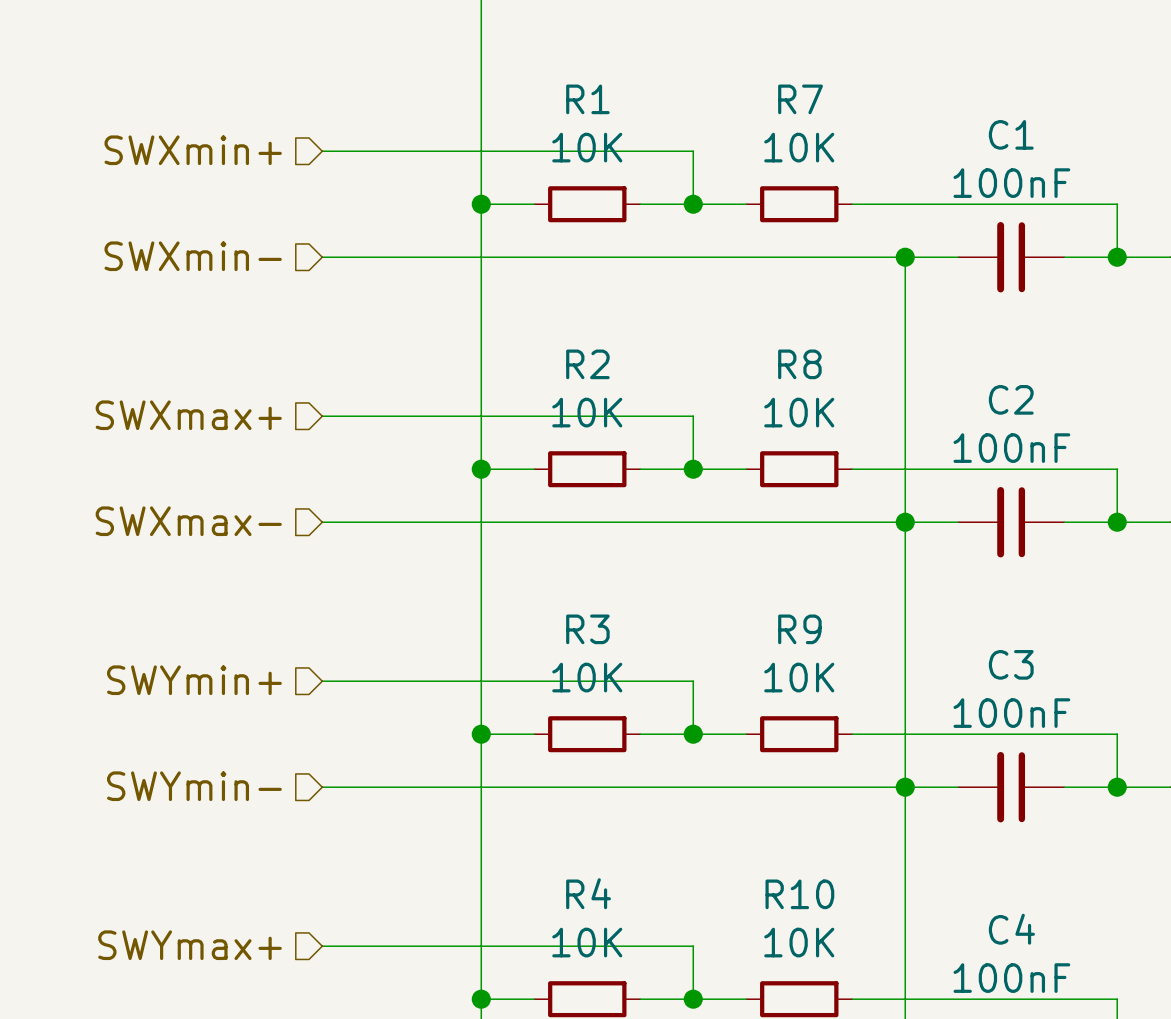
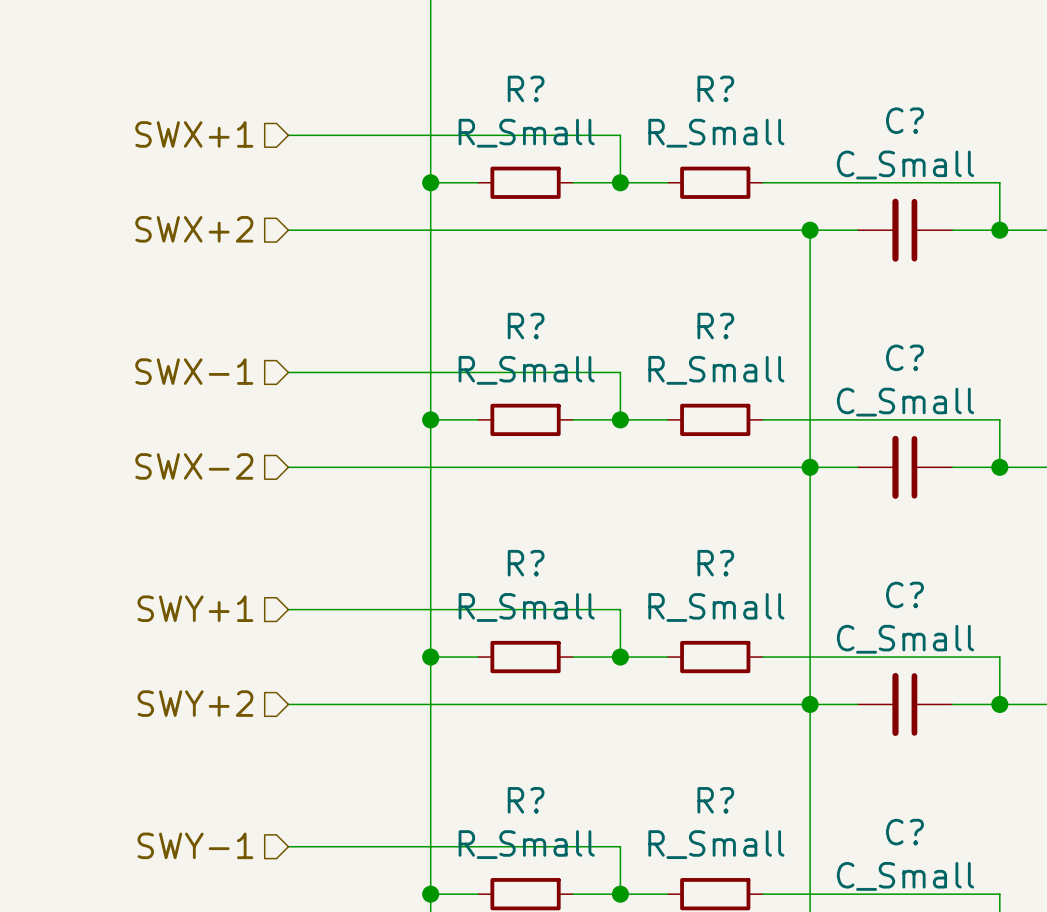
R1 name: R1 (587, 99) -> R? (526, 88)
R7 name: R7 (800, 99) -> R? (715, 88)
C1 name: C1 (1011, 134) -> C? (904, 120)
R1 value: 10K (587, 147) -> R_Small (526, 133)
R7 value: 10K (799, 147) -> R_Small (716, 133)
hierarchical label: SWXmin+ (193, 150) -> SWX+1 (194, 134)
C1 value: 100nF (1011, 183) -> C_Small (905, 164)
hierarchical label: SWXmin- (193, 256) -> SWX+2 (194, 229)
R2 name: R2 (587, 364) -> R? (526, 326)
R8 name: R8 (799, 364) -> R? (715, 326)
C2 name: C2 (1011, 399) -> C? (904, 357)
R2 value: 10K (587, 412) -> R_Small (526, 370)
R8 value: 10K (799, 412) -> R_Small (716, 370)
hierarchical label: SWXmax+ (188, 415) -> SWX-1 (194, 371)
C2 value: 100nF (1011, 448) -> C_Small (905, 402)
hierarchical label: SWXmax- (188, 521) -> SWX-2 (194, 466)
R3 name: R3 (587, 629) -> R? (526, 563)
R9 name: R9 (799, 629) -> R? (715, 563)
C3 name: C3 (1011, 664) -> C? (904, 594)
R3 value: 10K (587, 677) -> R_Small (526, 607)
R9 value: 10K (799, 677) -> R_Small (716, 607)
hierarchical label: SWYmin+ (194, 680) -> SWY+1 (195, 608)
C3 value: 100nF (1011, 713) -> C_Small (905, 639)
hierarchical label: SWYmin- (194, 786) -> SWY+2 (195, 703)
R4 name: R4 (588, 893) -> R? (526, 800)
R10 name: R10 (799, 894) -> R? (715, 800)
C4 name: C4 (1011, 929) -> C? (904, 832)
R4 value: 10K (587, 942) -> R_Small (526, 844)
R10 value: 10K (799, 942) -> R_Small (716, 844)
hierarchical label: SWYmax+ (190, 945) -> SWY-1 (195, 845)
C4 value: 100nF (1011, 978) -> C_Small (905, 876)

